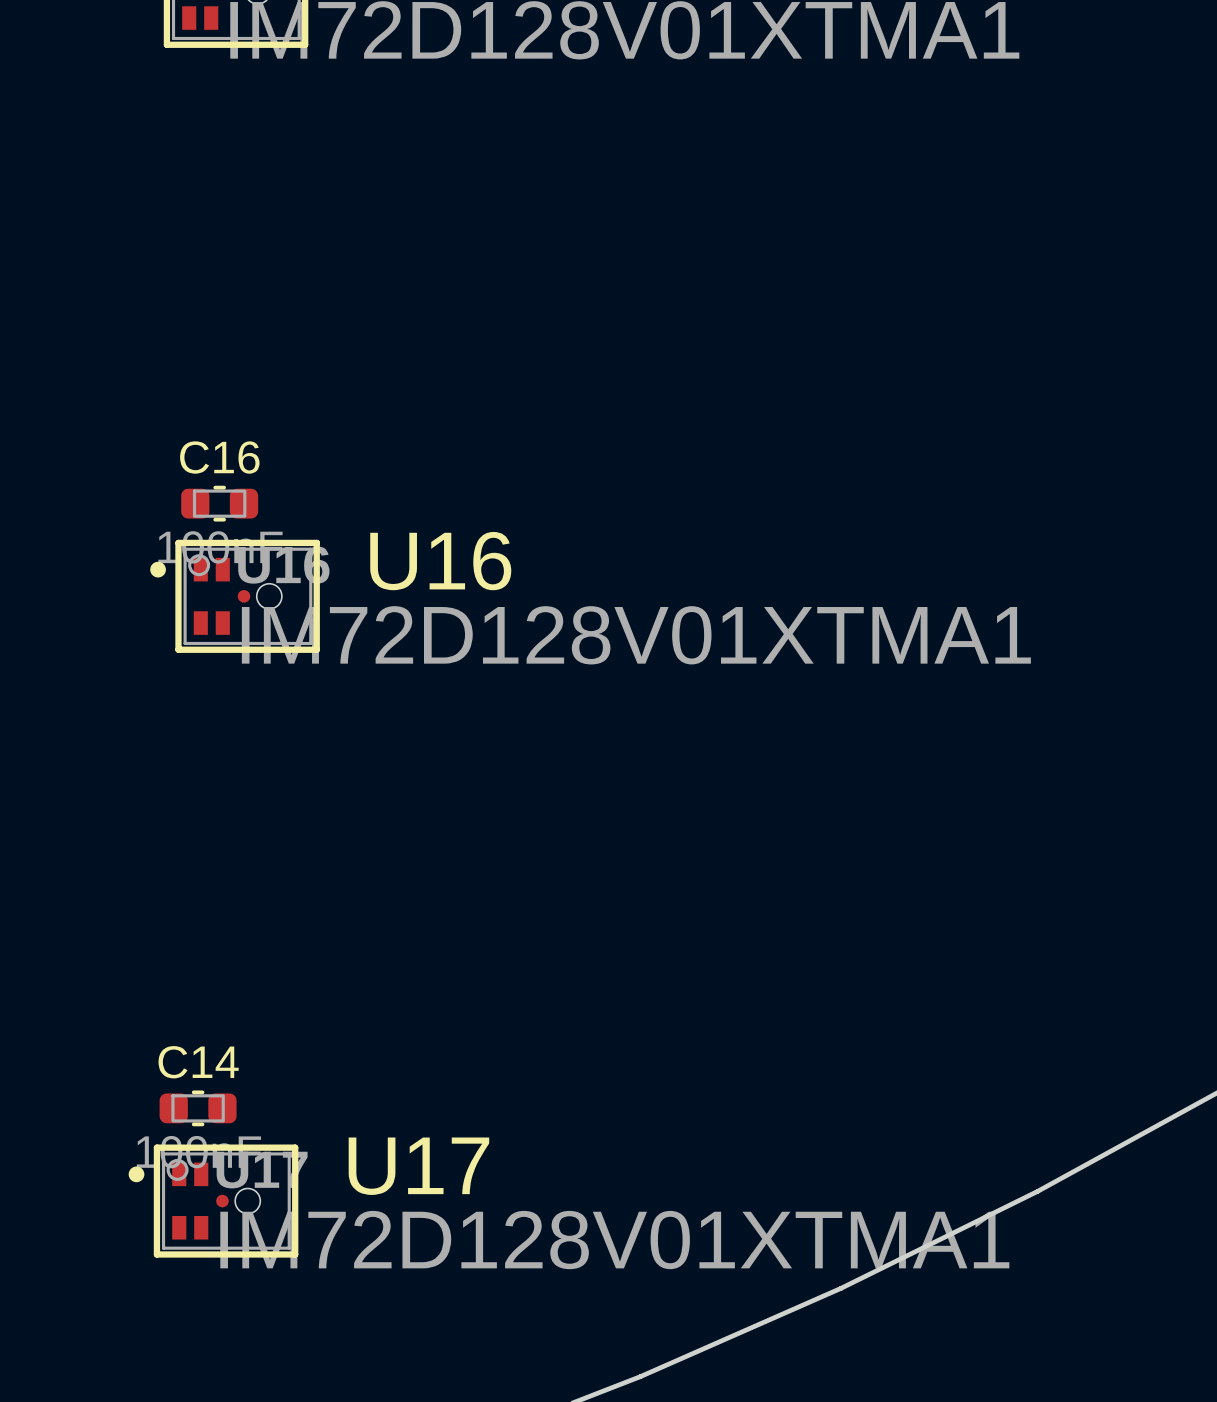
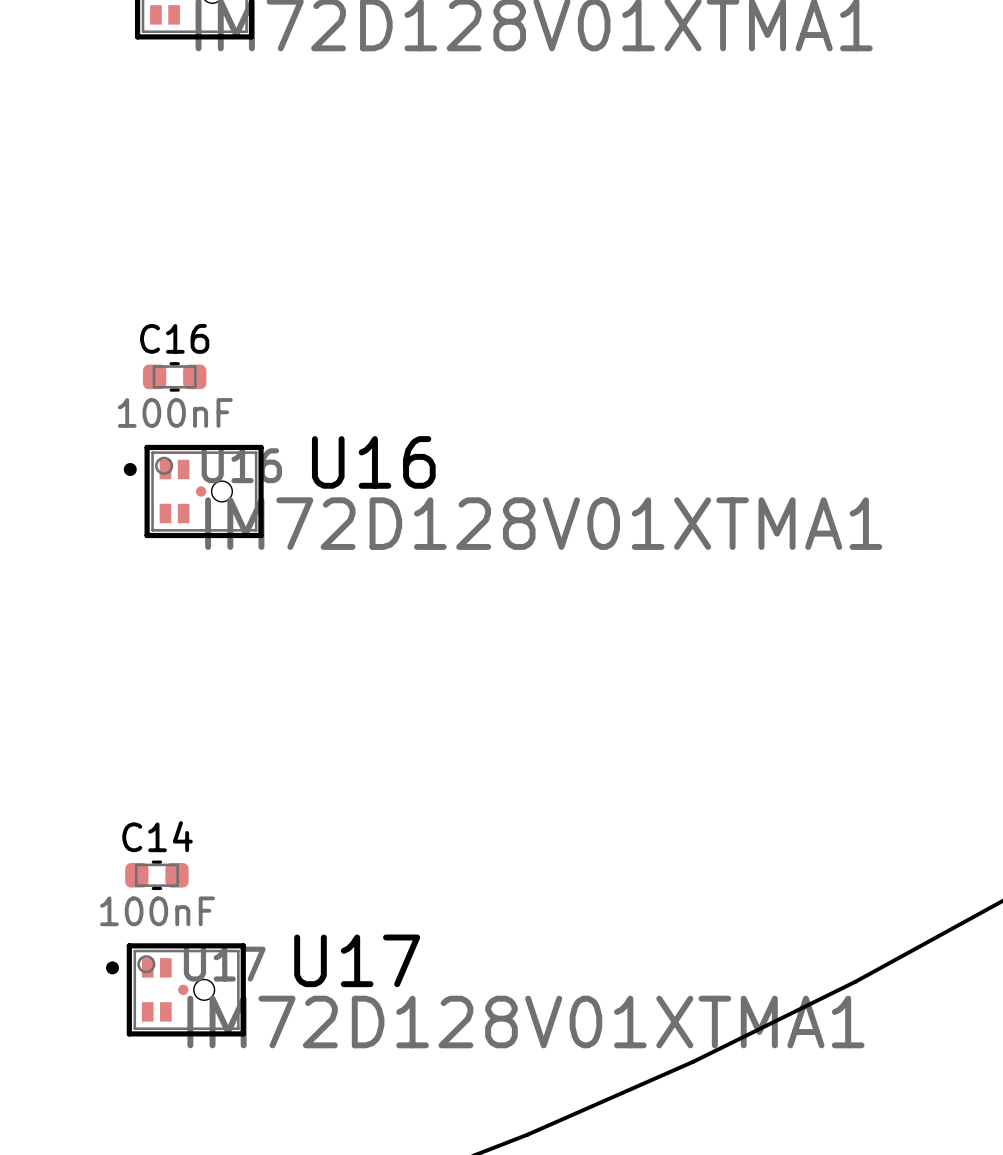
C16 position: (219, 503) -> (174, 376)
C14 position: (198, 1108) -> (156, 875)

